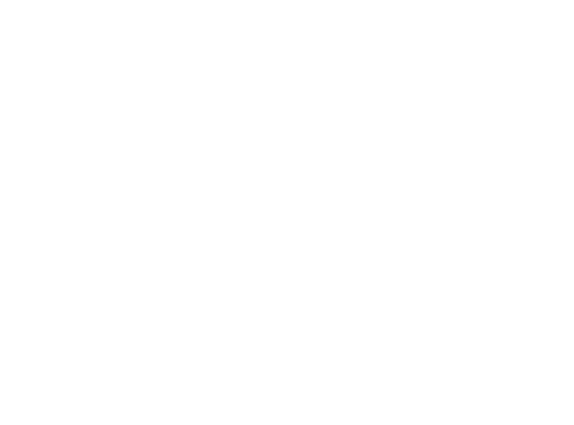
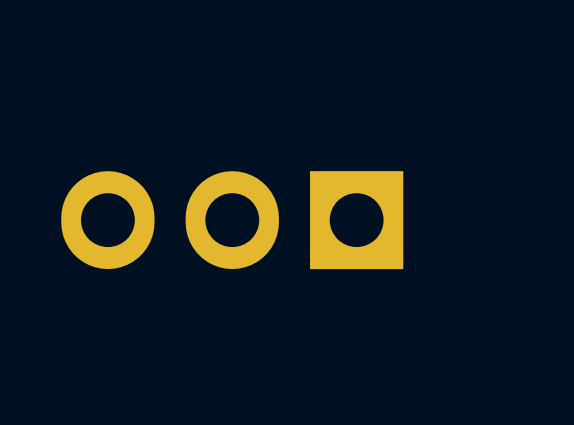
part: none -> (232, 220)

